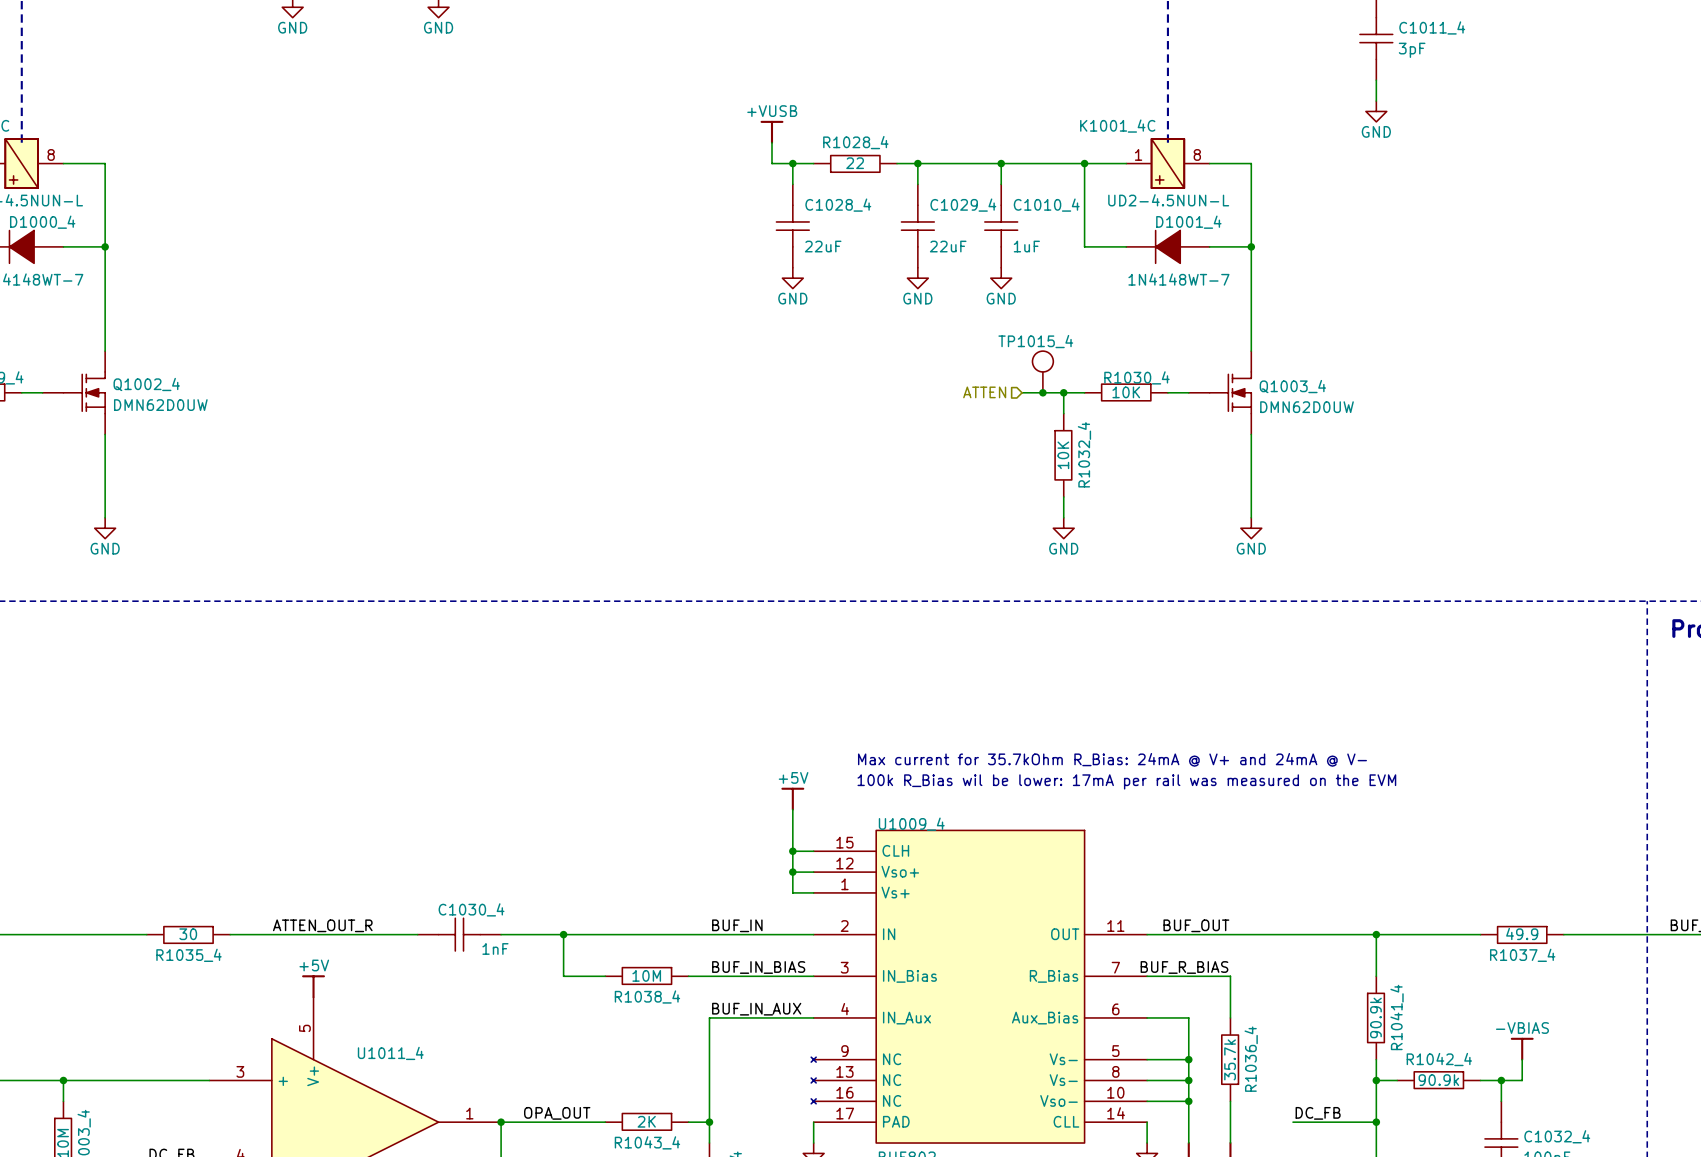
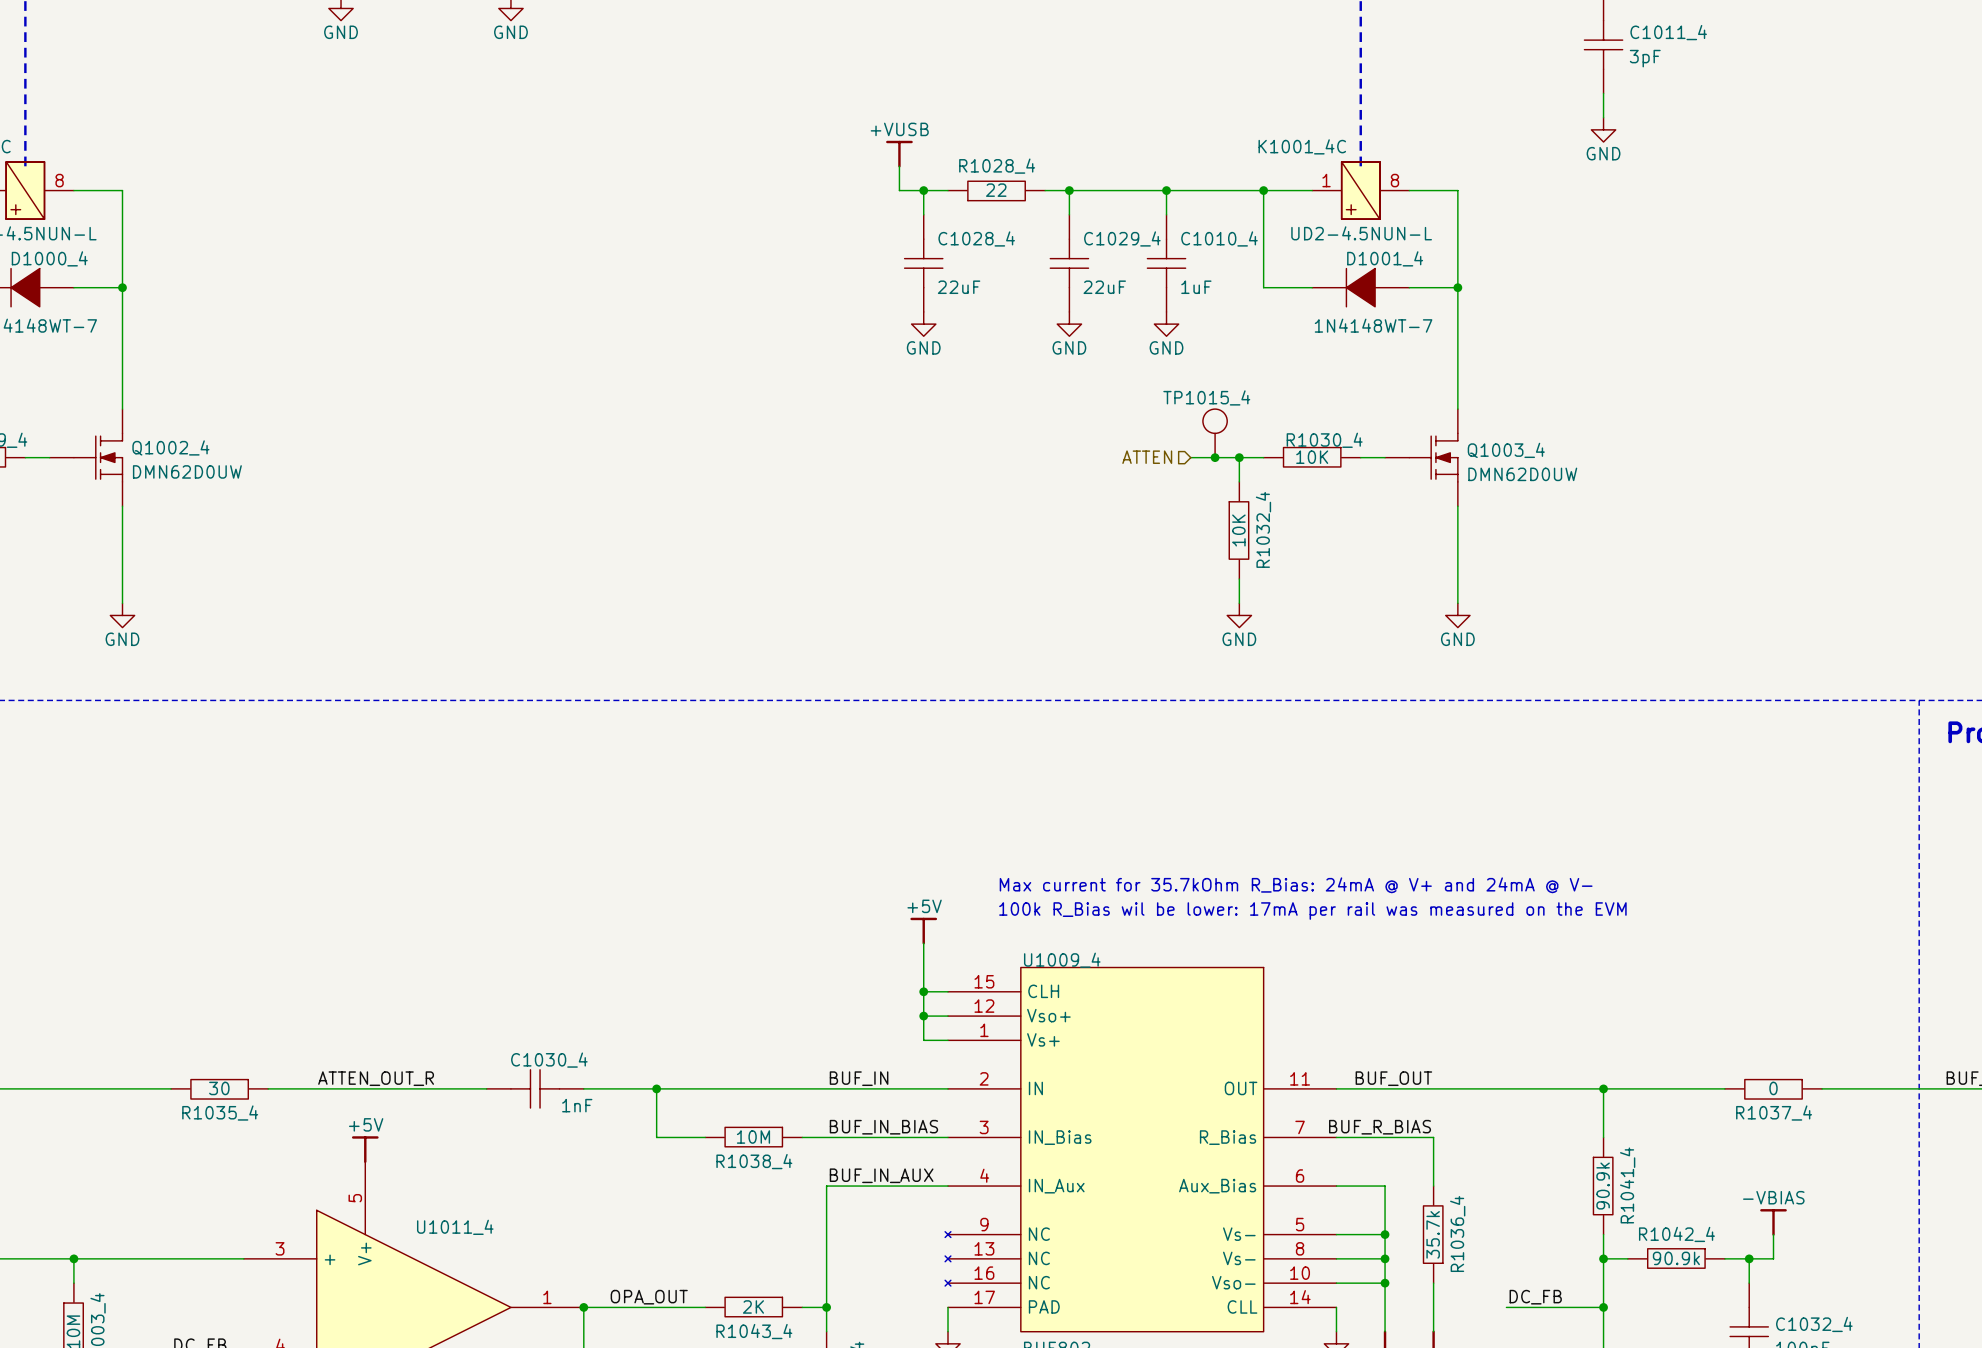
R1037_4 value: 49.9 (1522, 933) -> 0 (1773, 1088)

